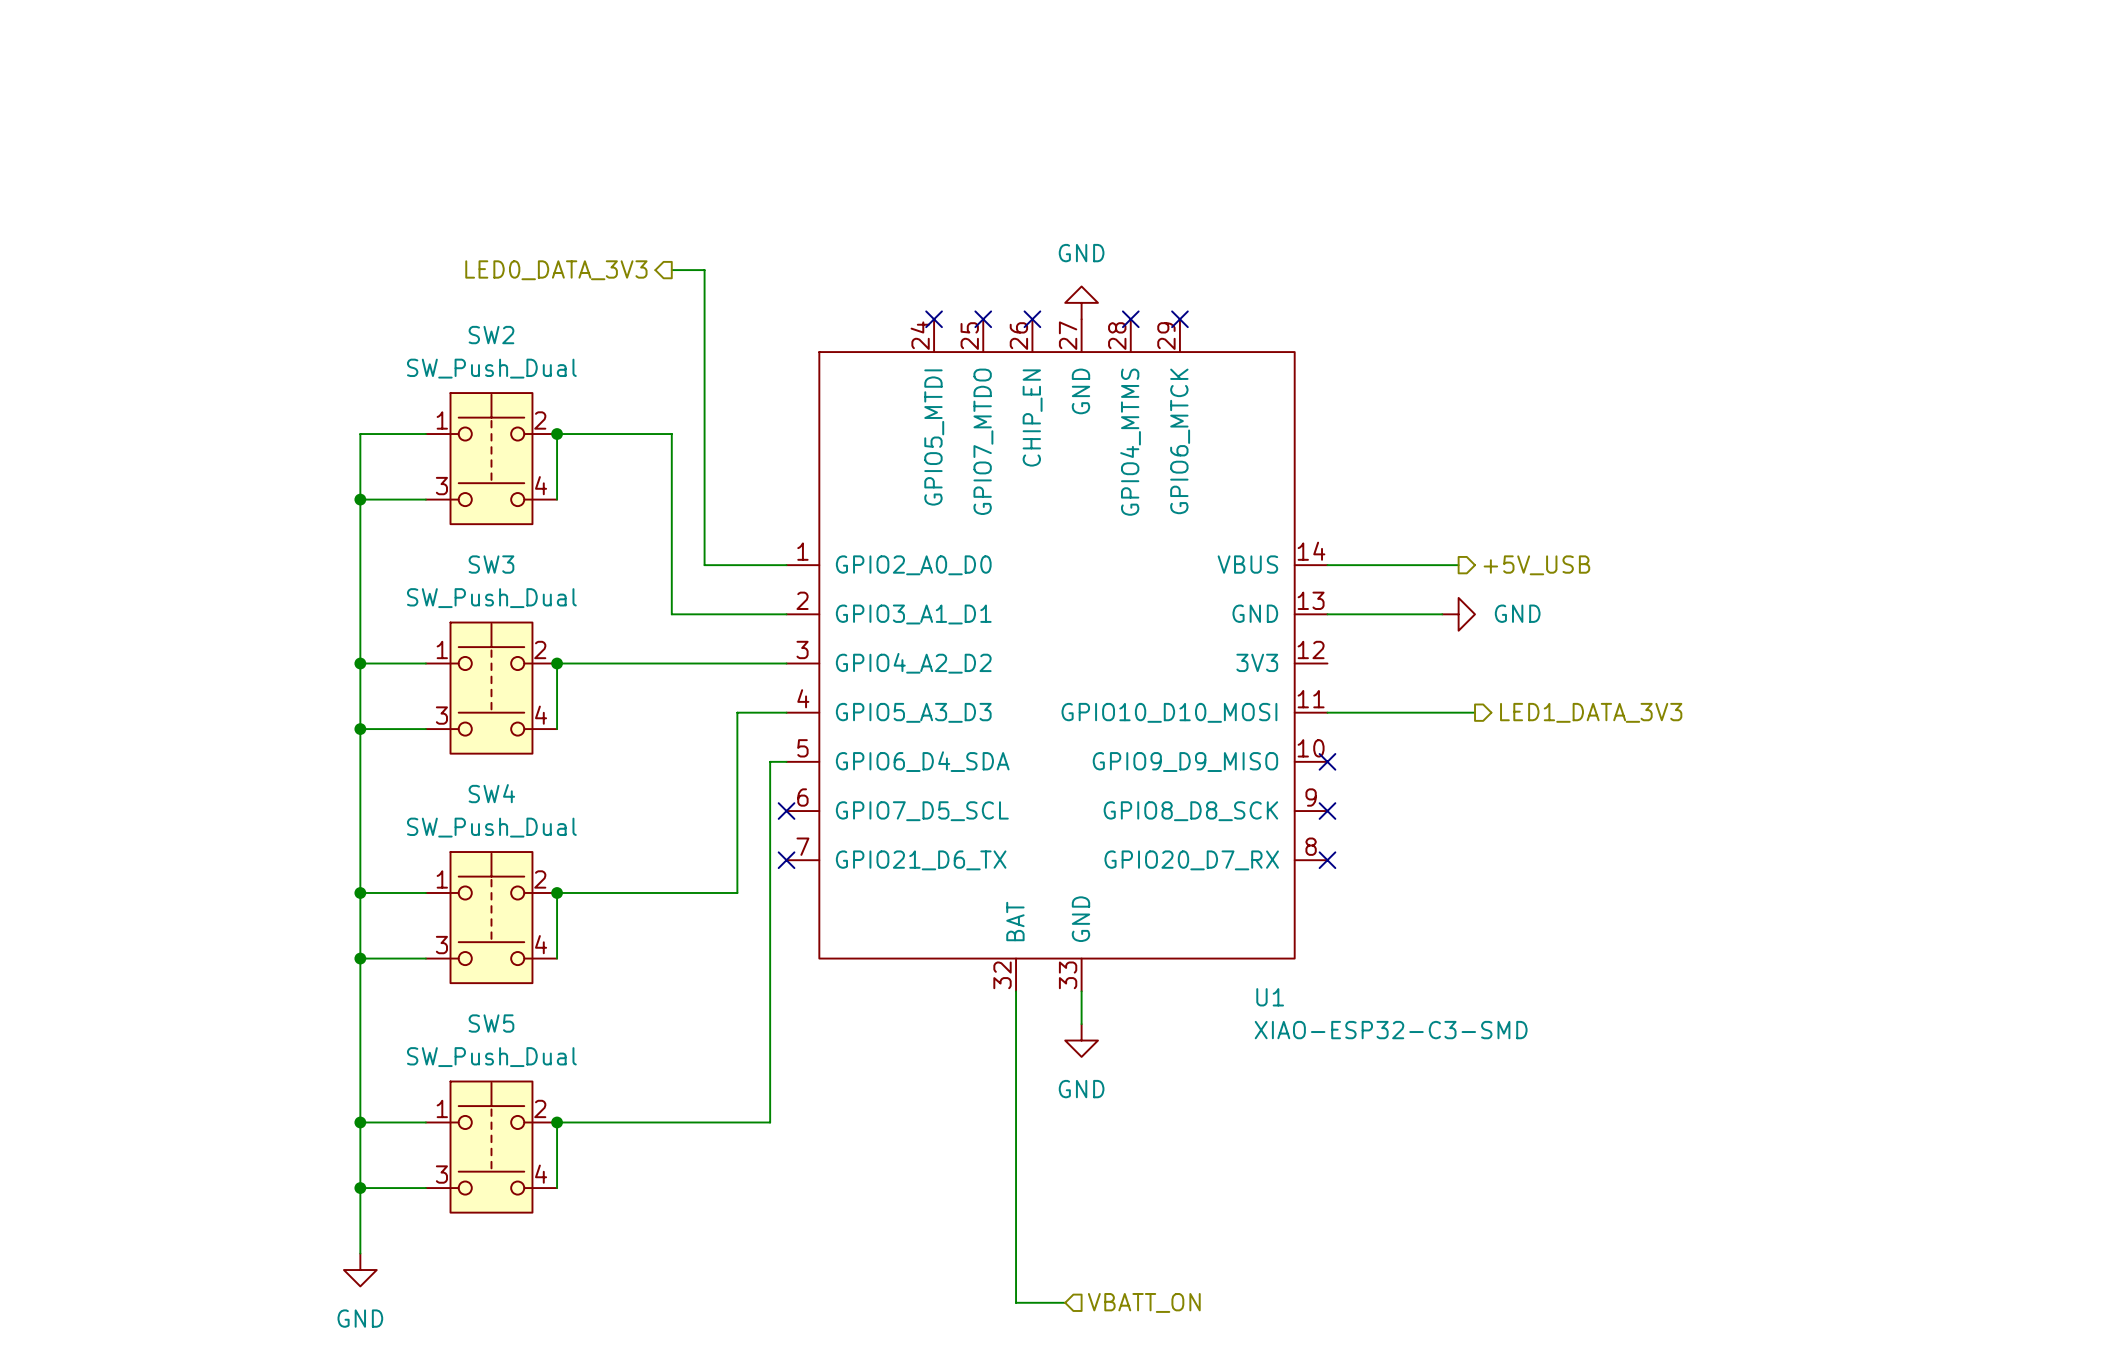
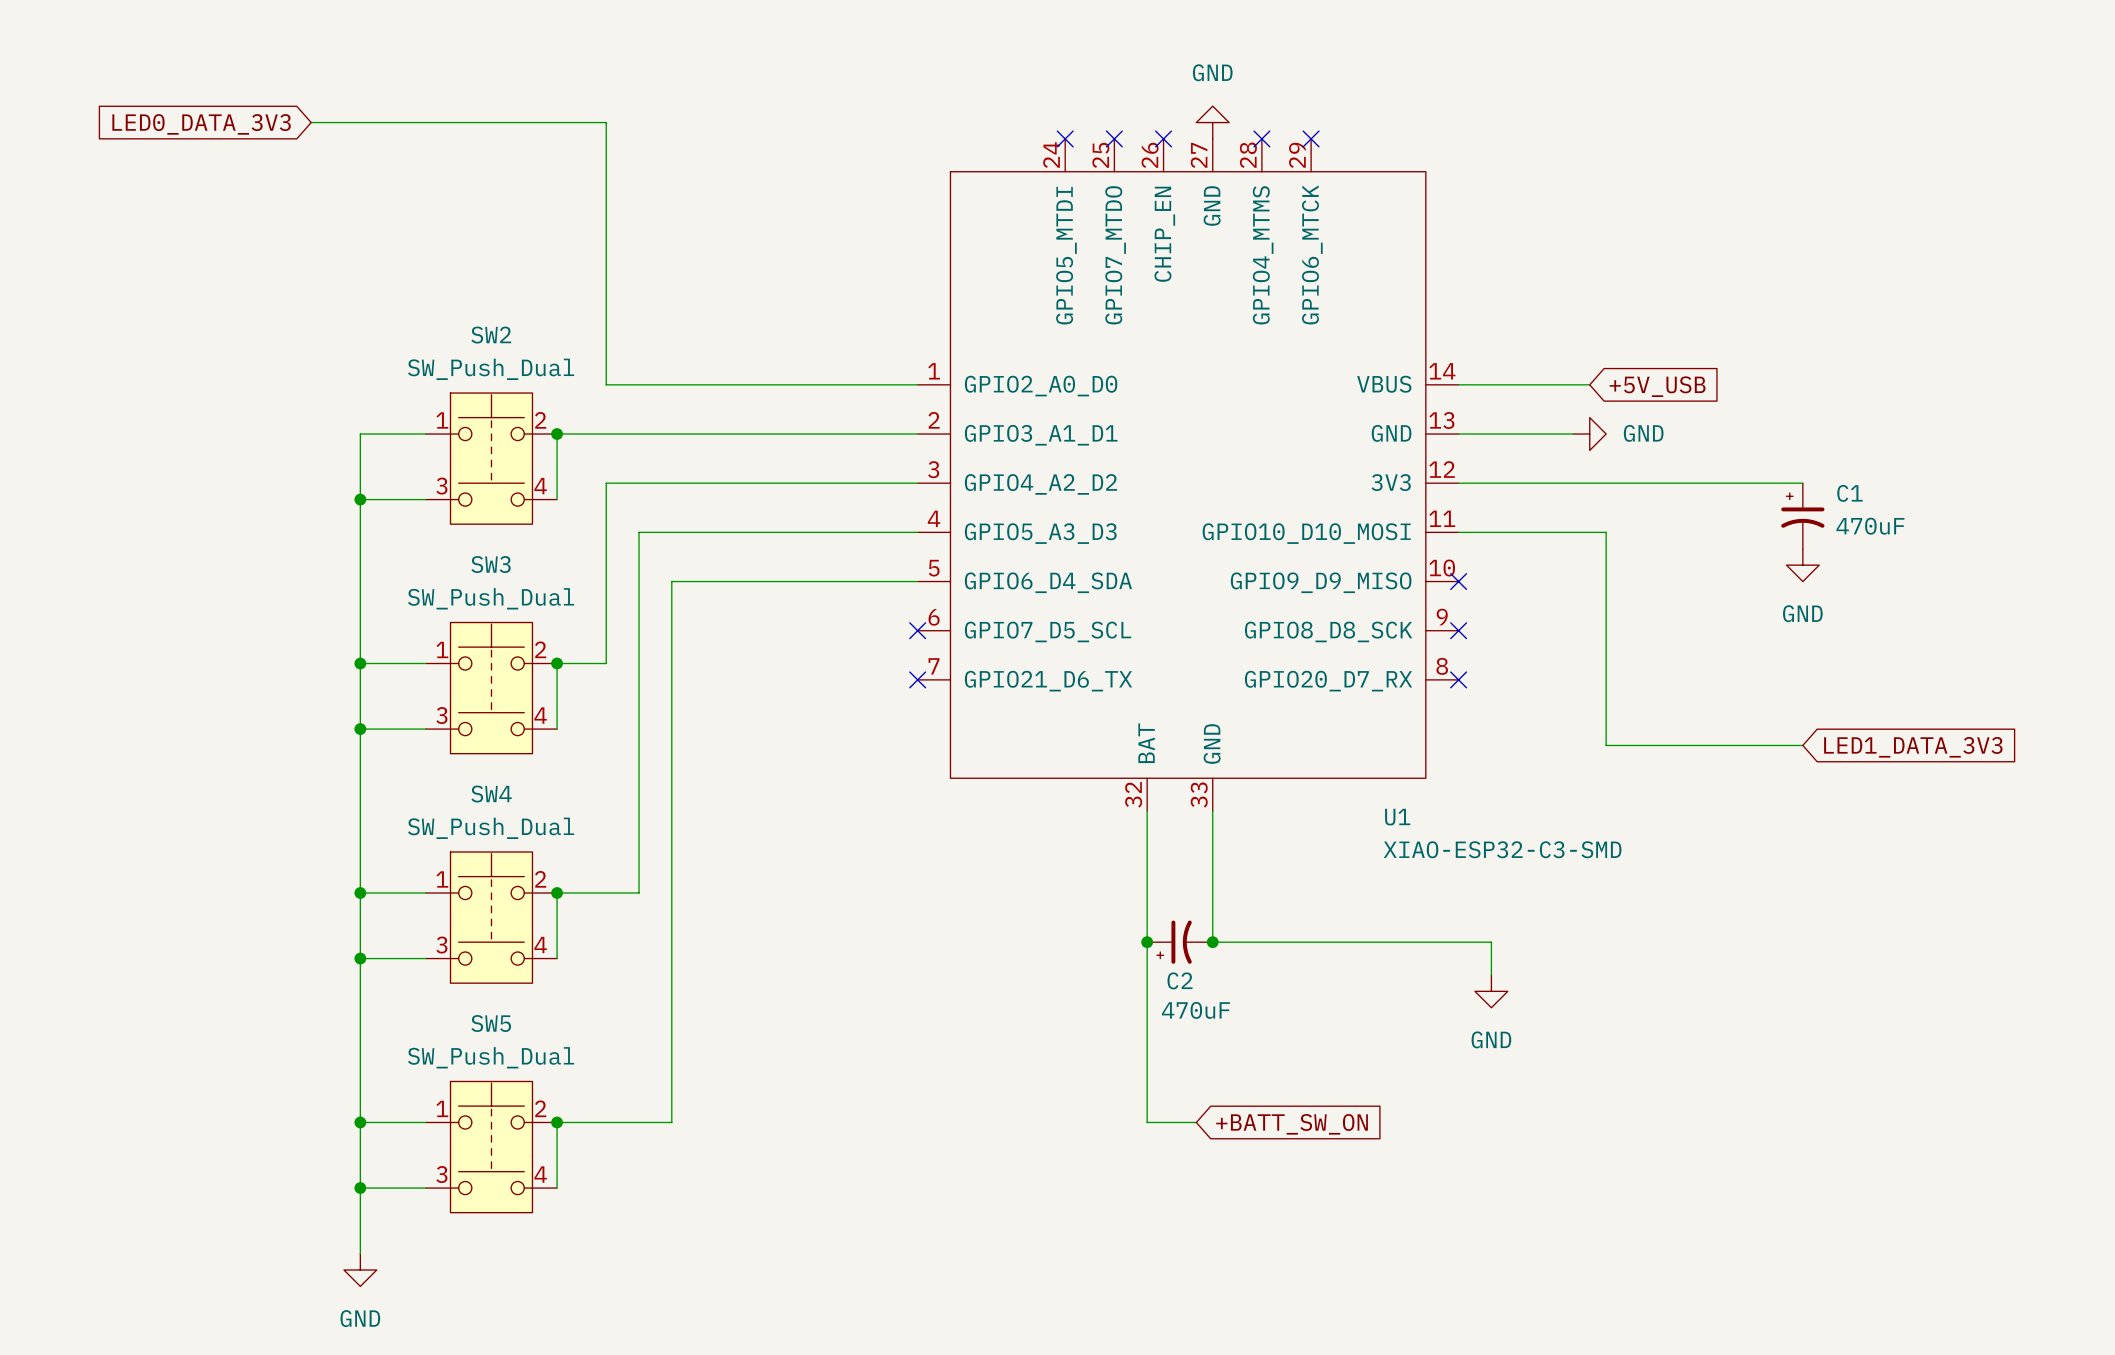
wire: none -> (311, 122) (606, 122) (606, 384) (917, 384)
global label: none -> LED0_DATA_3V3 (201, 124)
no-connect mark: none -> (1065, 138)
no-connect mark: none -> (1114, 138)
no-connect mark: none -> (1163, 138)
no-connect mark: none -> (1261, 138)
no-connect mark: none -> (1311, 138)
hierarchical label: LED0_DATA_3V3 (556, 270) -> none
wire: (671, 270) (704, 270) (704, 565) (786, 565) -> none
power symbol position: GND (1081, 302) -> GND (1212, 122)
no-connect mark: (934, 319) -> none
no-connect mark: (983, 319) -> none
no-connect mark: (1032, 319) -> none
no-connect mark: (1130, 319) -> none
no-connect mark: (1179, 319) -> none
global label: none -> +5V_USB (1657, 386)
wire: (671, 434) (671, 581) -> (671, 434) (917, 434)
power symbol: none -> GND (1589, 434)
wire: none -> (1458, 483) (1802, 483)
C1: none -> 470uF (1802, 515)
wire: none -> (1458, 532) (1606, 532) (1606, 745) (1802, 745)
wire: (1327, 565) (1458, 565) -> (1458, 384) (1589, 384)
hierarchical label: +5V_USB (1536, 565) -> none
power symbol: none -> GND (1802, 565)
wire: none -> (671, 581) (917, 581)
no-connect mark: none -> (1458, 581)
wire: (671, 614) (786, 614) -> none
wire: (1327, 614) (1442, 614) -> (1458, 434) (1573, 434)
power symbol: GND (1458, 614) -> none
no-connect mark: none -> (917, 630)
no-connect mark: none -> (1458, 630)
U1 position: (1057, 655) -> (1188, 474)
wire: (606, 663) (786, 663) -> (606, 663) (606, 483) (917, 483)
no-connect mark: none -> (917, 679)
no-connect mark: none -> (1458, 679)
wire: (786, 712) (737, 712) (737, 892) (639, 892) -> (917, 532) (639, 532) (639, 892)
wire: (1327, 712) (1475, 712) -> none
hierarchical label: LED1_DATA_3V3 (1591, 712) -> none
global label: none -> LED1_DATA_3V3 (1913, 747)
wire: (786, 761) (770, 761) (770, 1122) (671, 1122) -> (671, 614) (671, 1122)
no-connect mark: (1327, 761) -> none
no-connect mark: (786, 811) -> none
wire: none -> (1212, 811) (1212, 942) (1491, 942) (1491, 974)
no-connect mark: (1327, 811) -> none
no-connect mark: (786, 860) -> none
no-connect mark: (1327, 860) -> none
junction: none -> (1147, 942)
C2: none -> 470uF (1179, 942)
junction: none -> (1212, 942)
wire: (1016, 991) (1016, 1302) (1065, 1302) -> (1147, 811) (1147, 1122) (1196, 1122)
wire: (1081, 991) (1081, 1024) -> none
power symbol: none -> GND (1491, 991)
power symbol: GND (1081, 1040) -> none
global label: none -> +BATT_SW_ON (1292, 1124)
hierarchical label: VBATT_ON (1144, 1302) -> none

